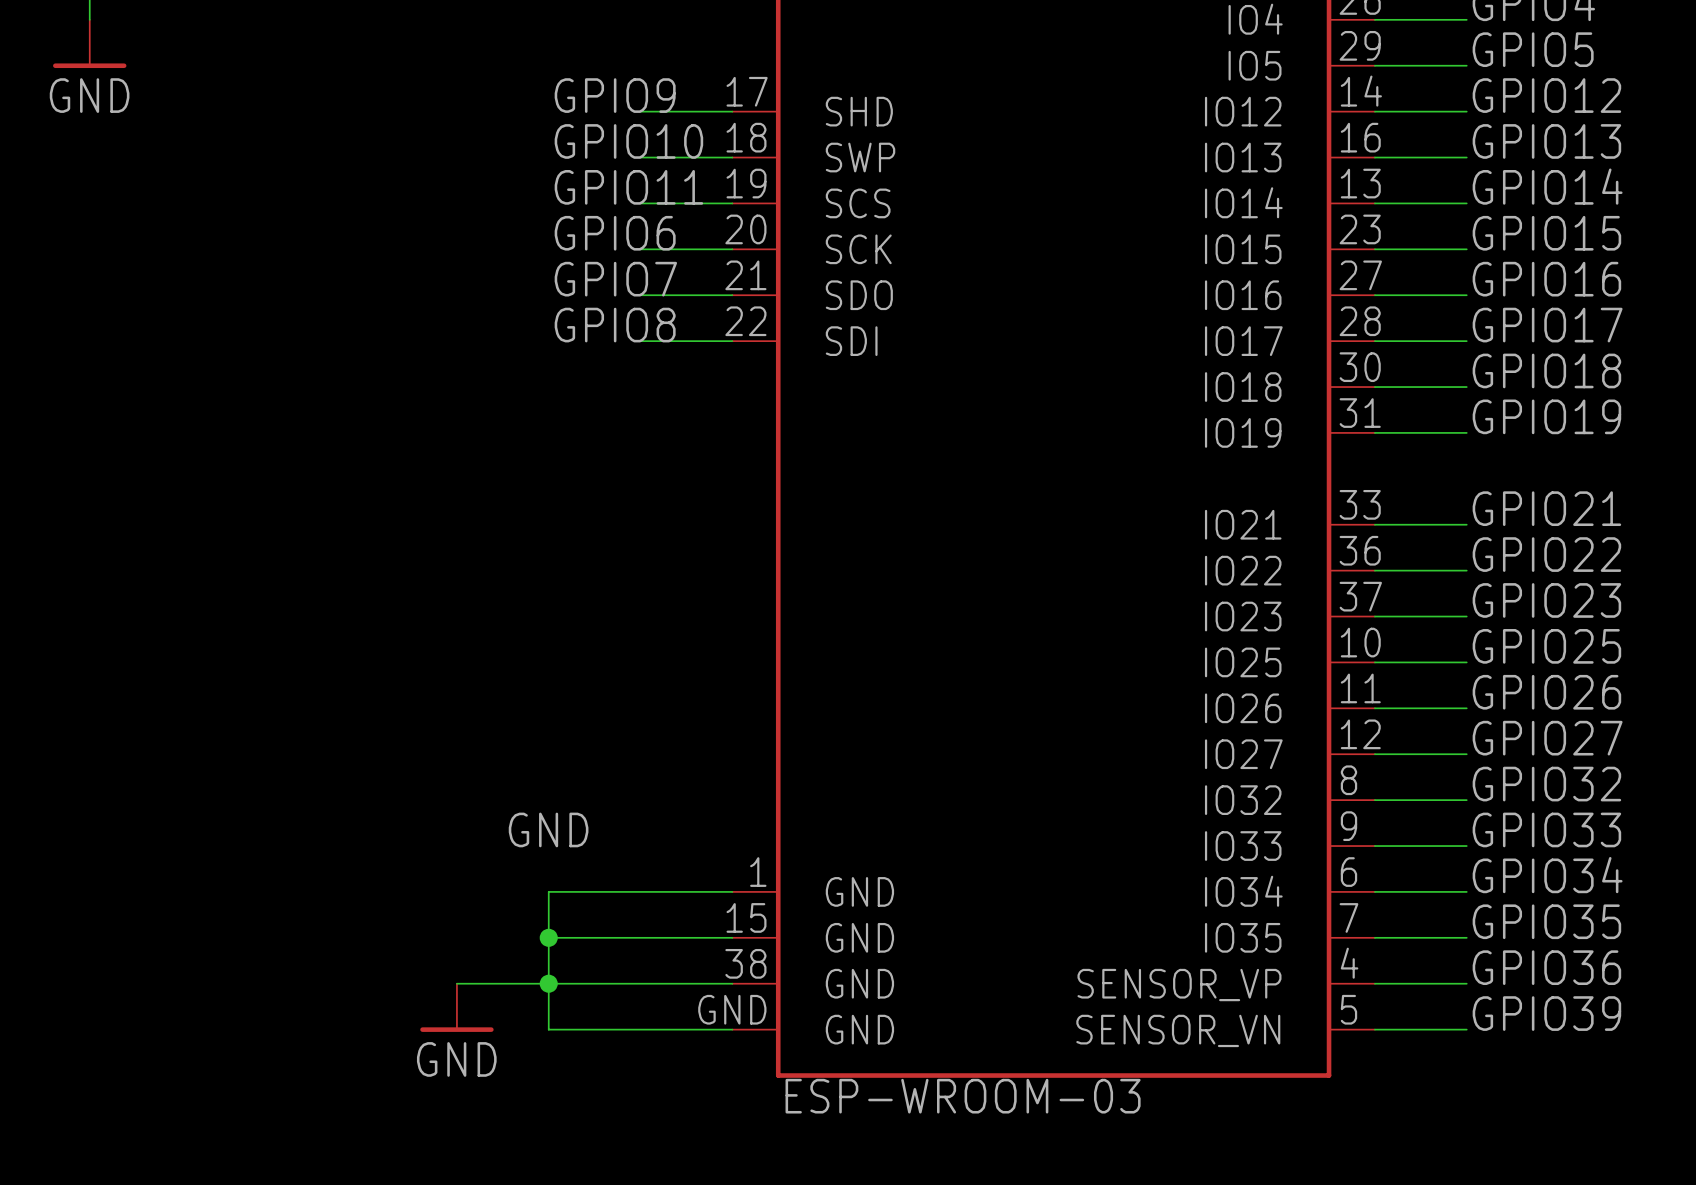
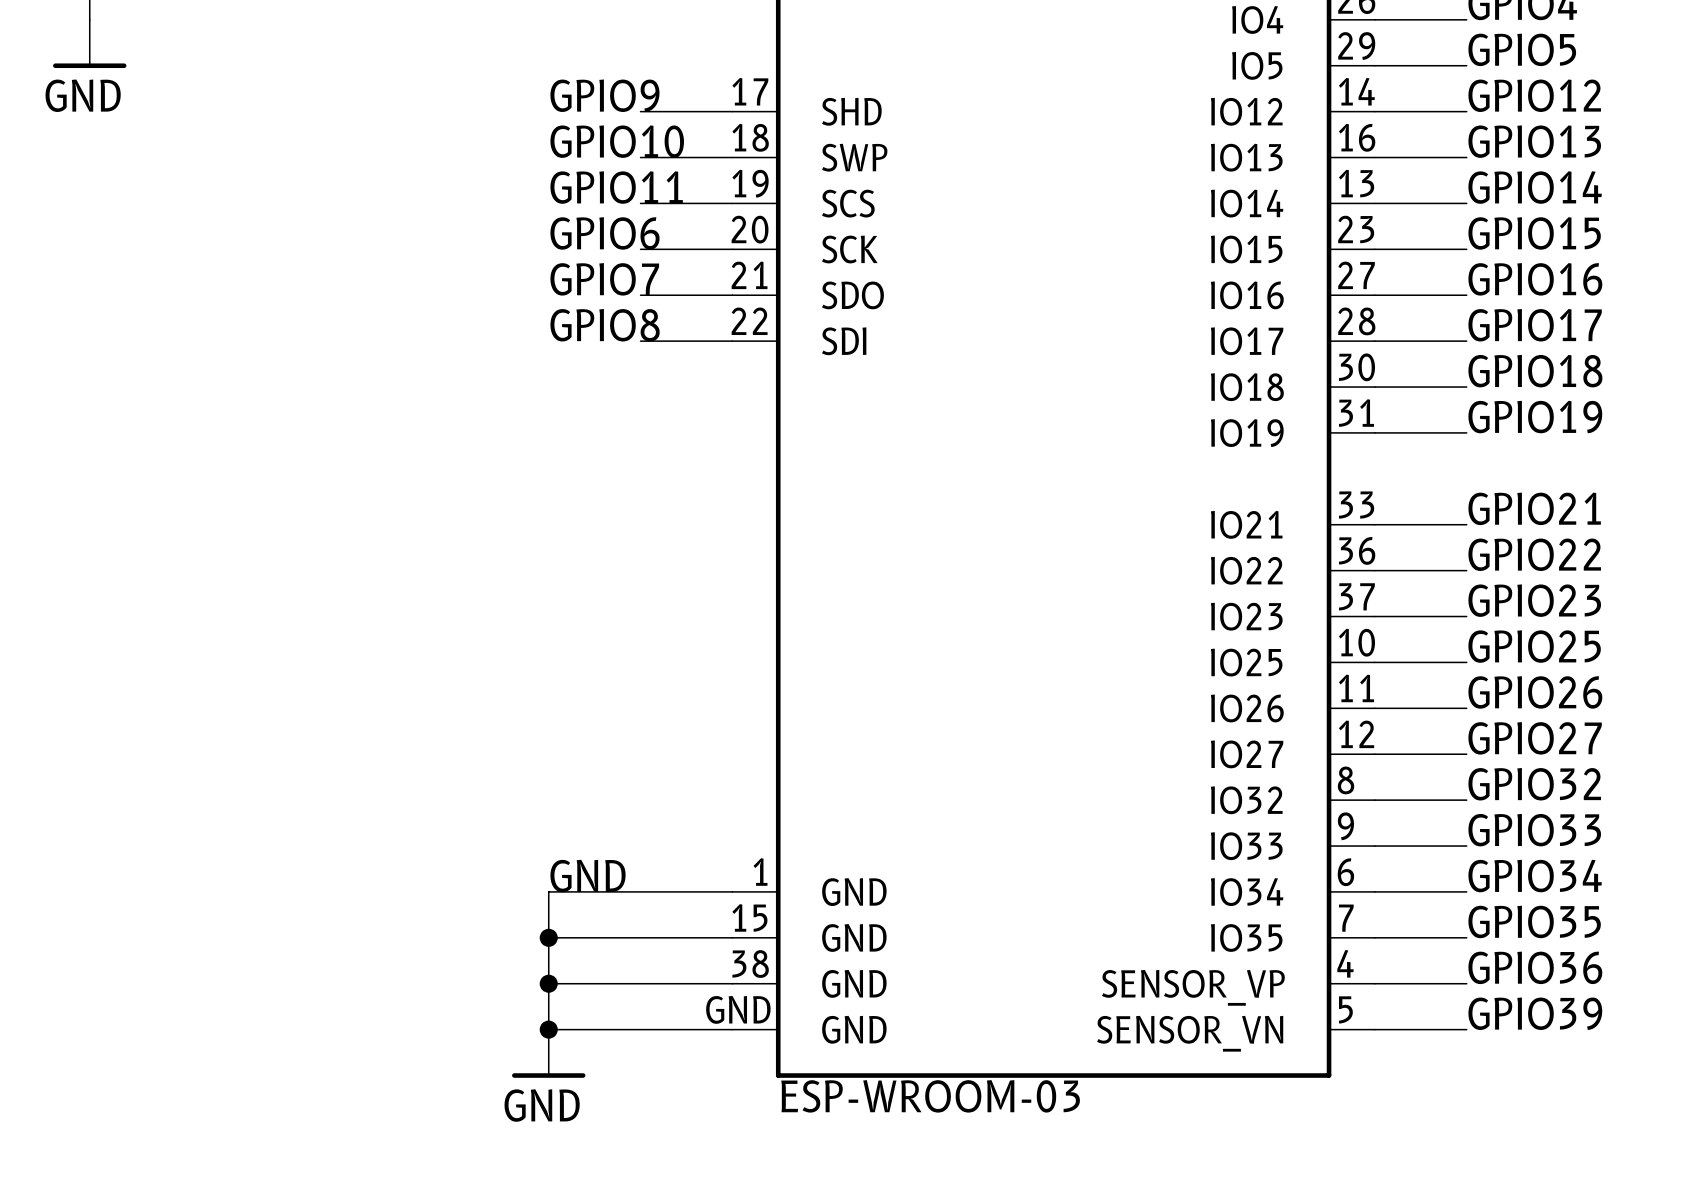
label position: GND (548, 829) -> GND (588, 876)
wire: (456, 983) (548, 983) -> none
power symbol position: GND (456, 1007) -> GND (548, 1053)
junction: none -> (548, 1029)

